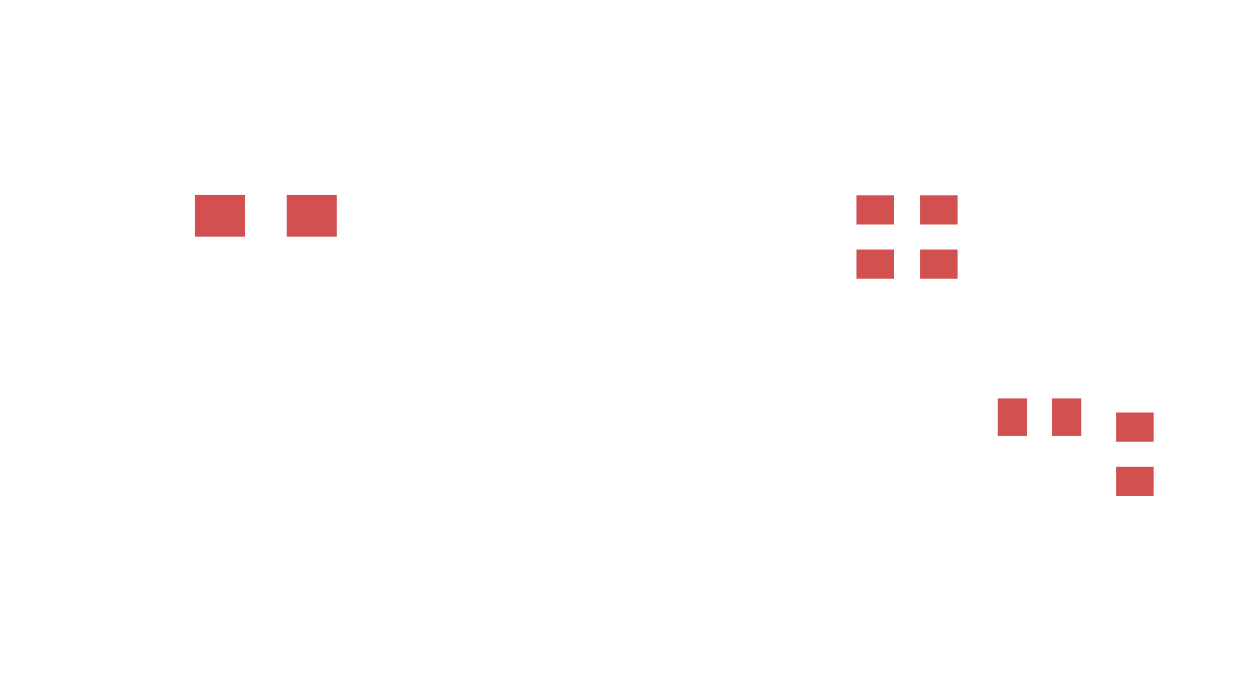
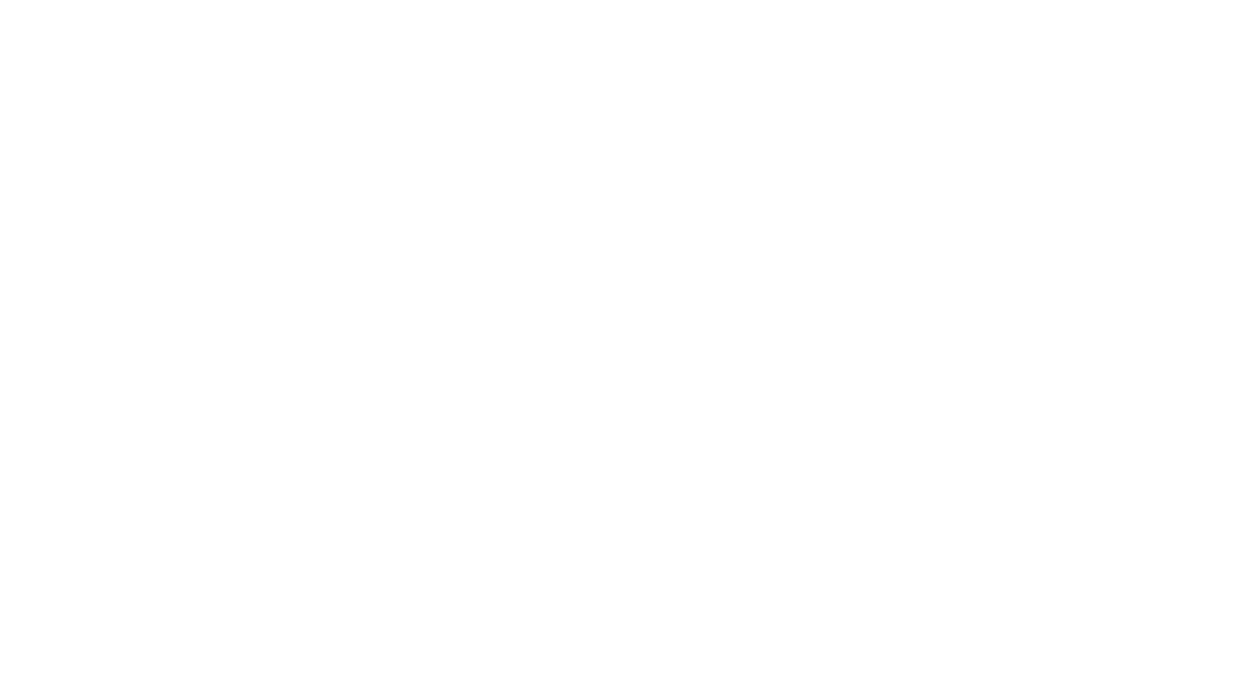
part: (265, 215) -> none
part: (875, 237) -> none
part: (938, 237) -> none
part: (1039, 417) -> none
part: (1134, 454) -> none

